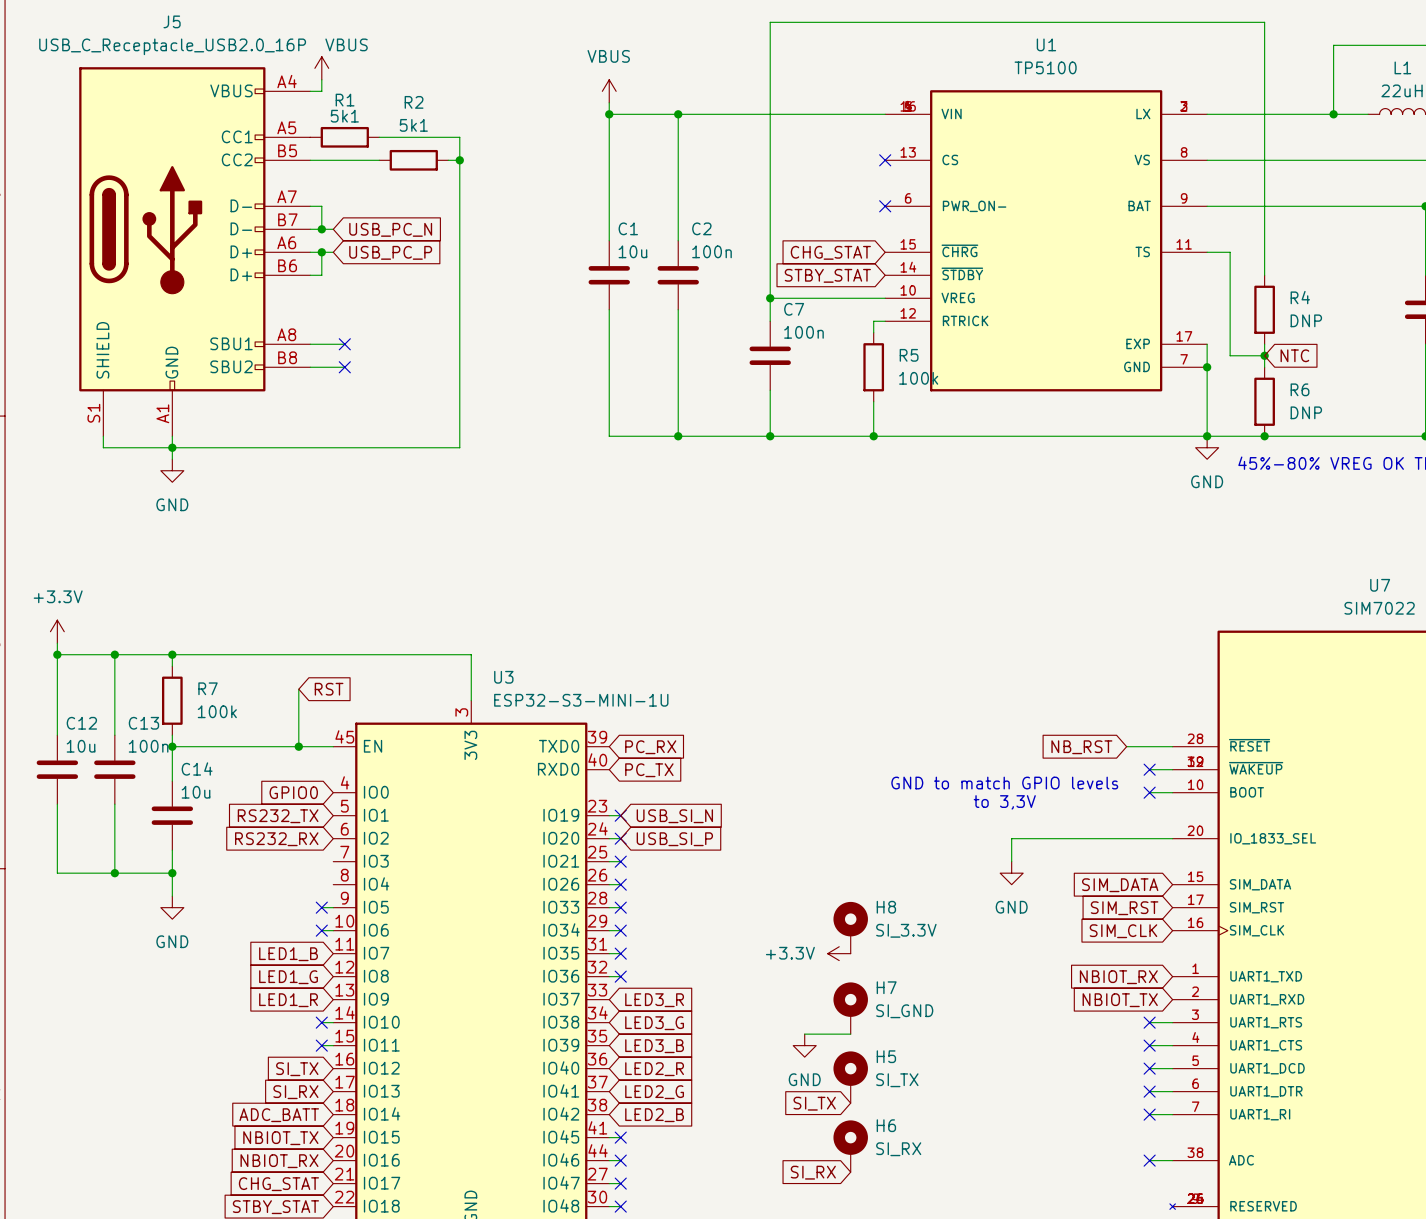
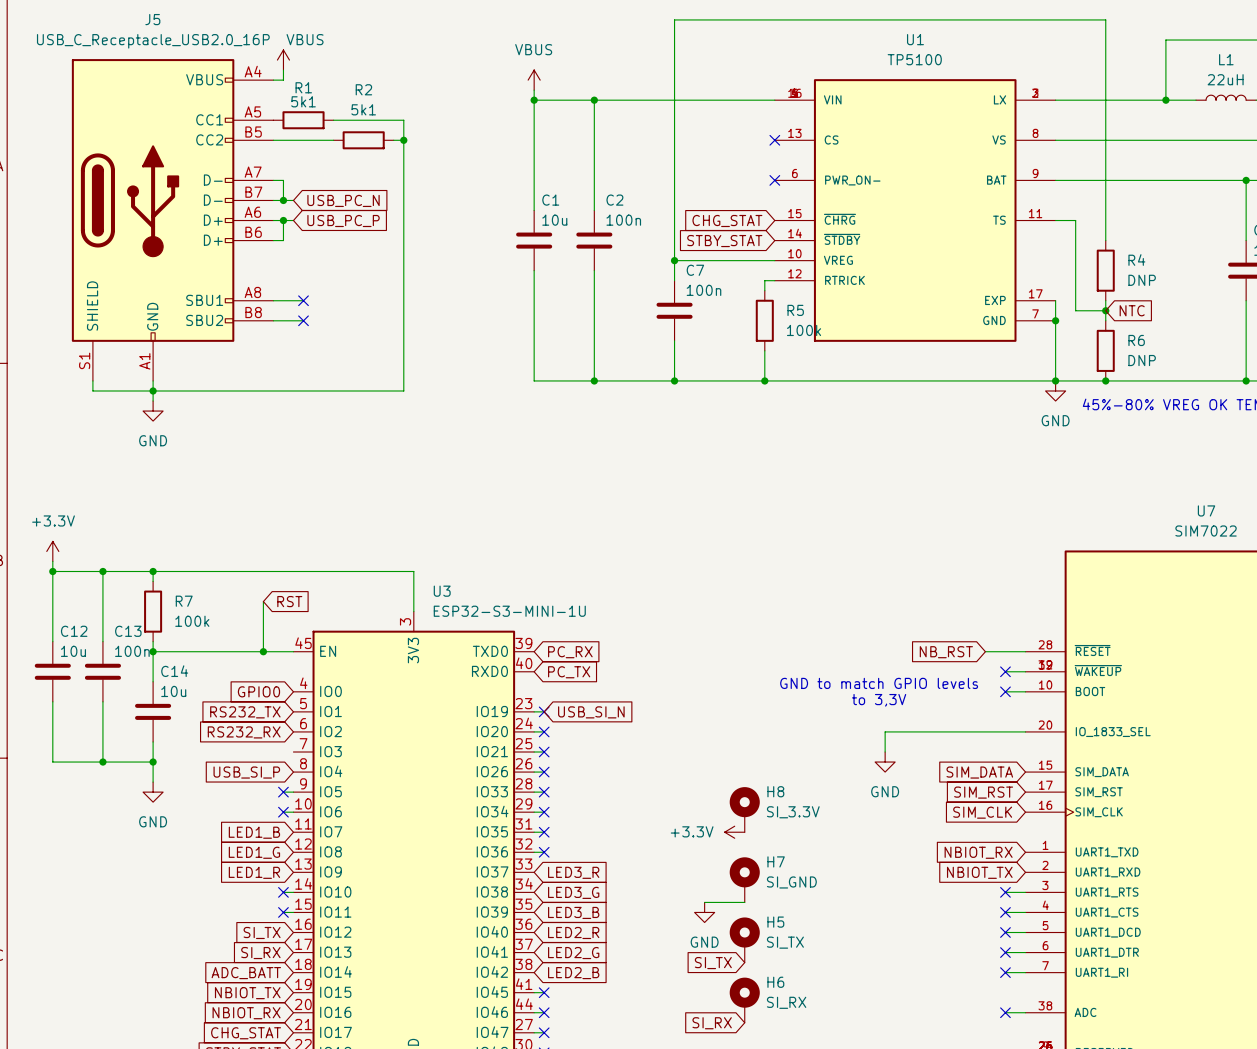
global label: USB_SI_P (674, 839) -> none
global label: none -> USB_SI_P (246, 772)

